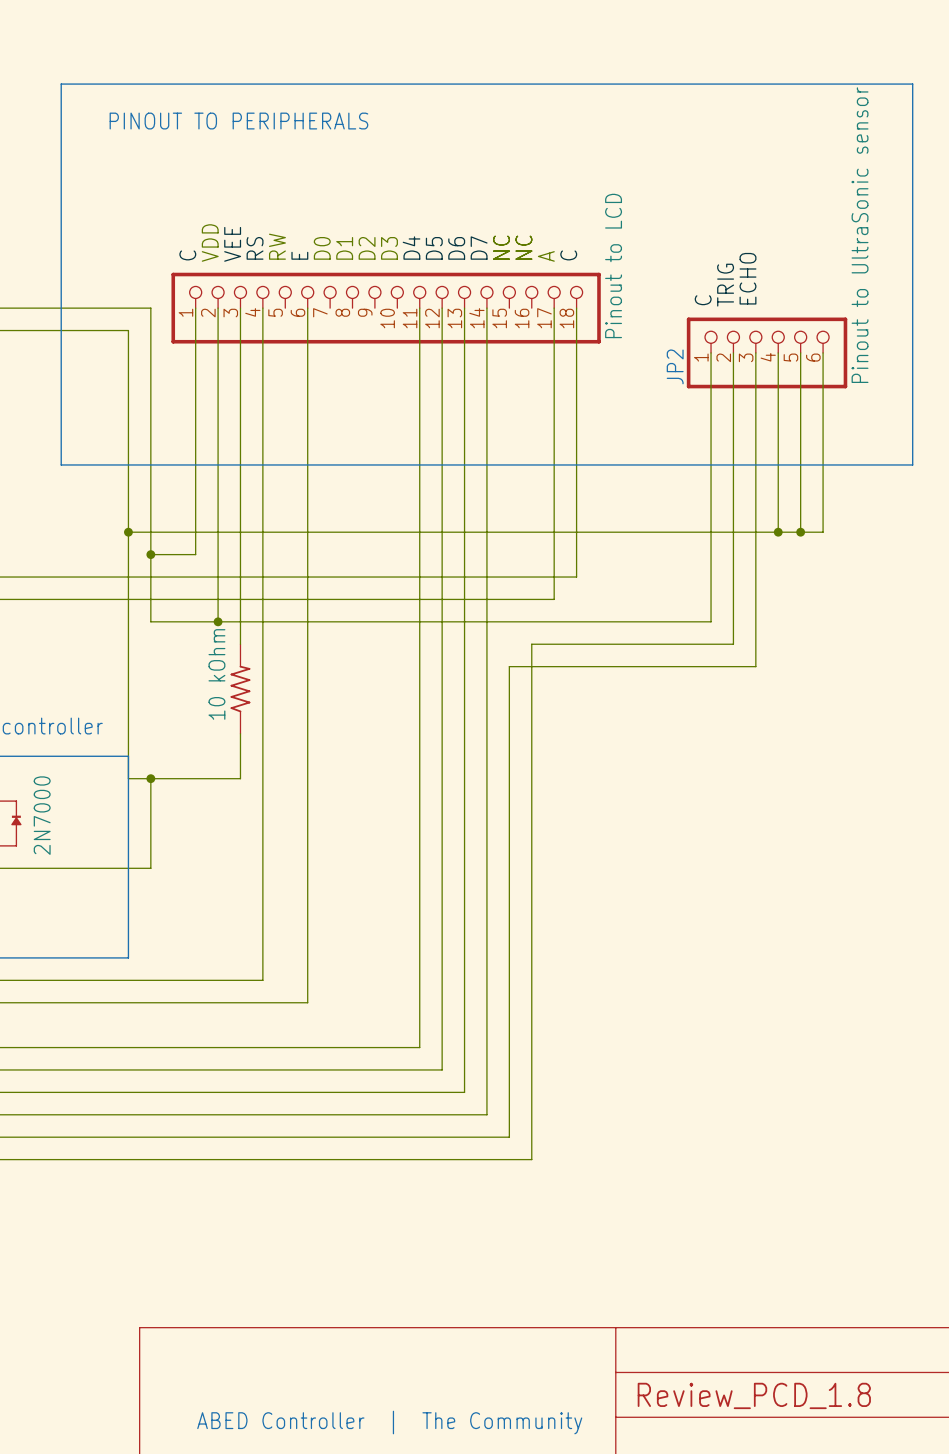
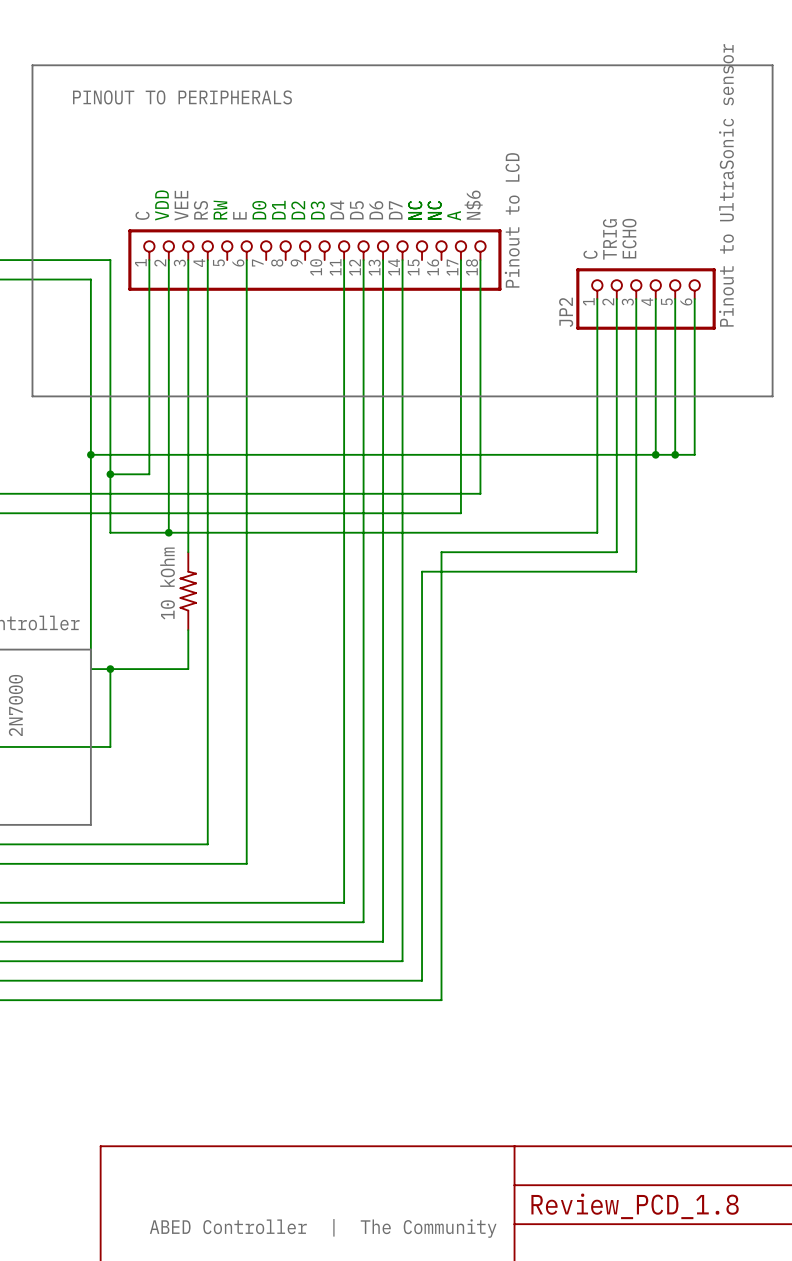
label: C (568, 255) -> N$6 (473, 205)

